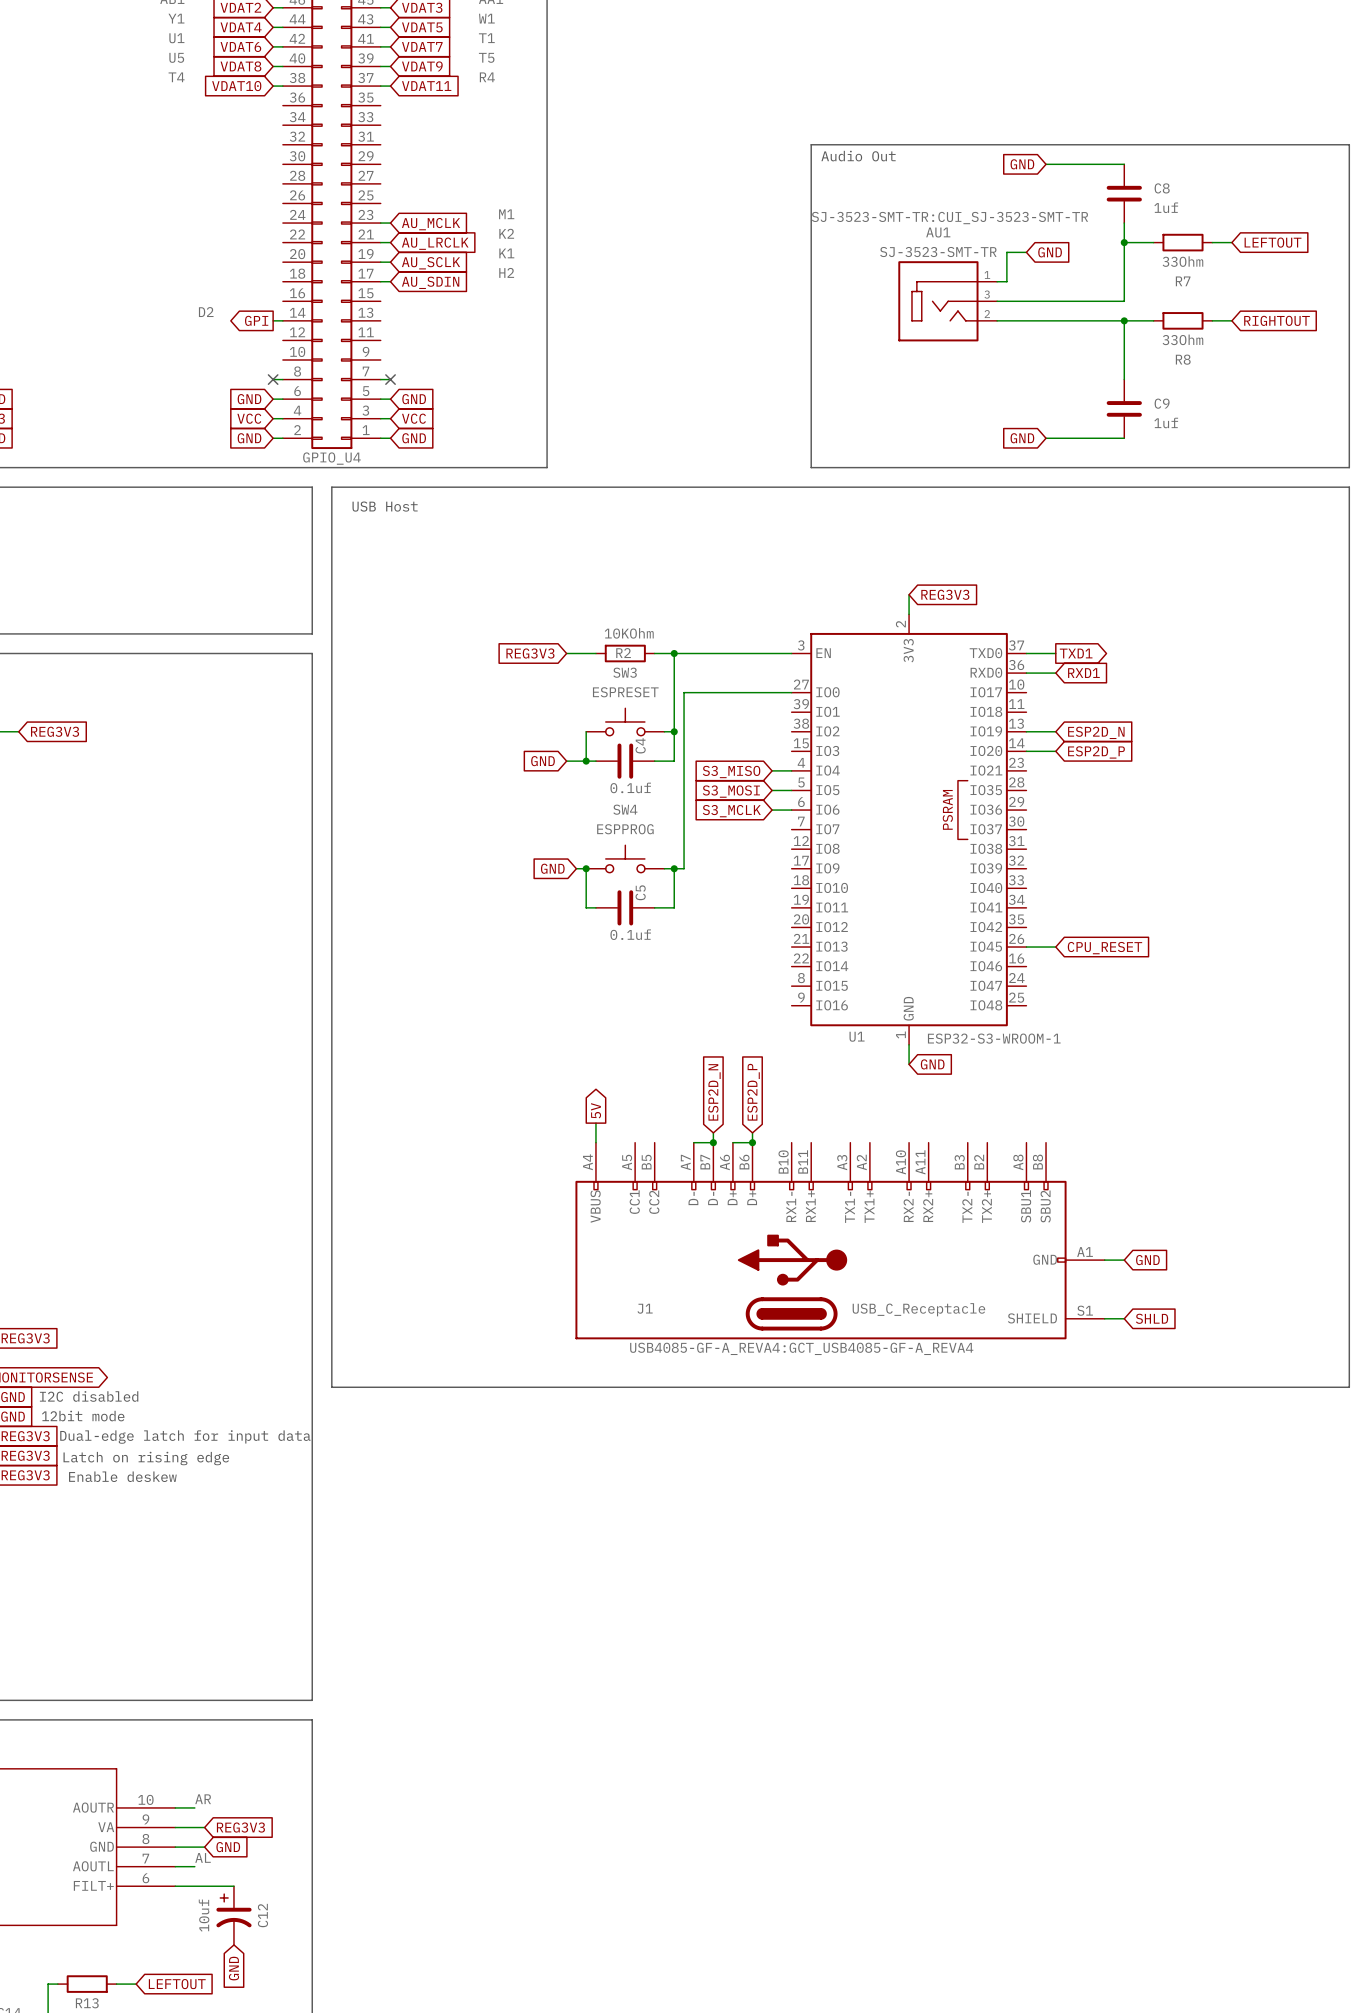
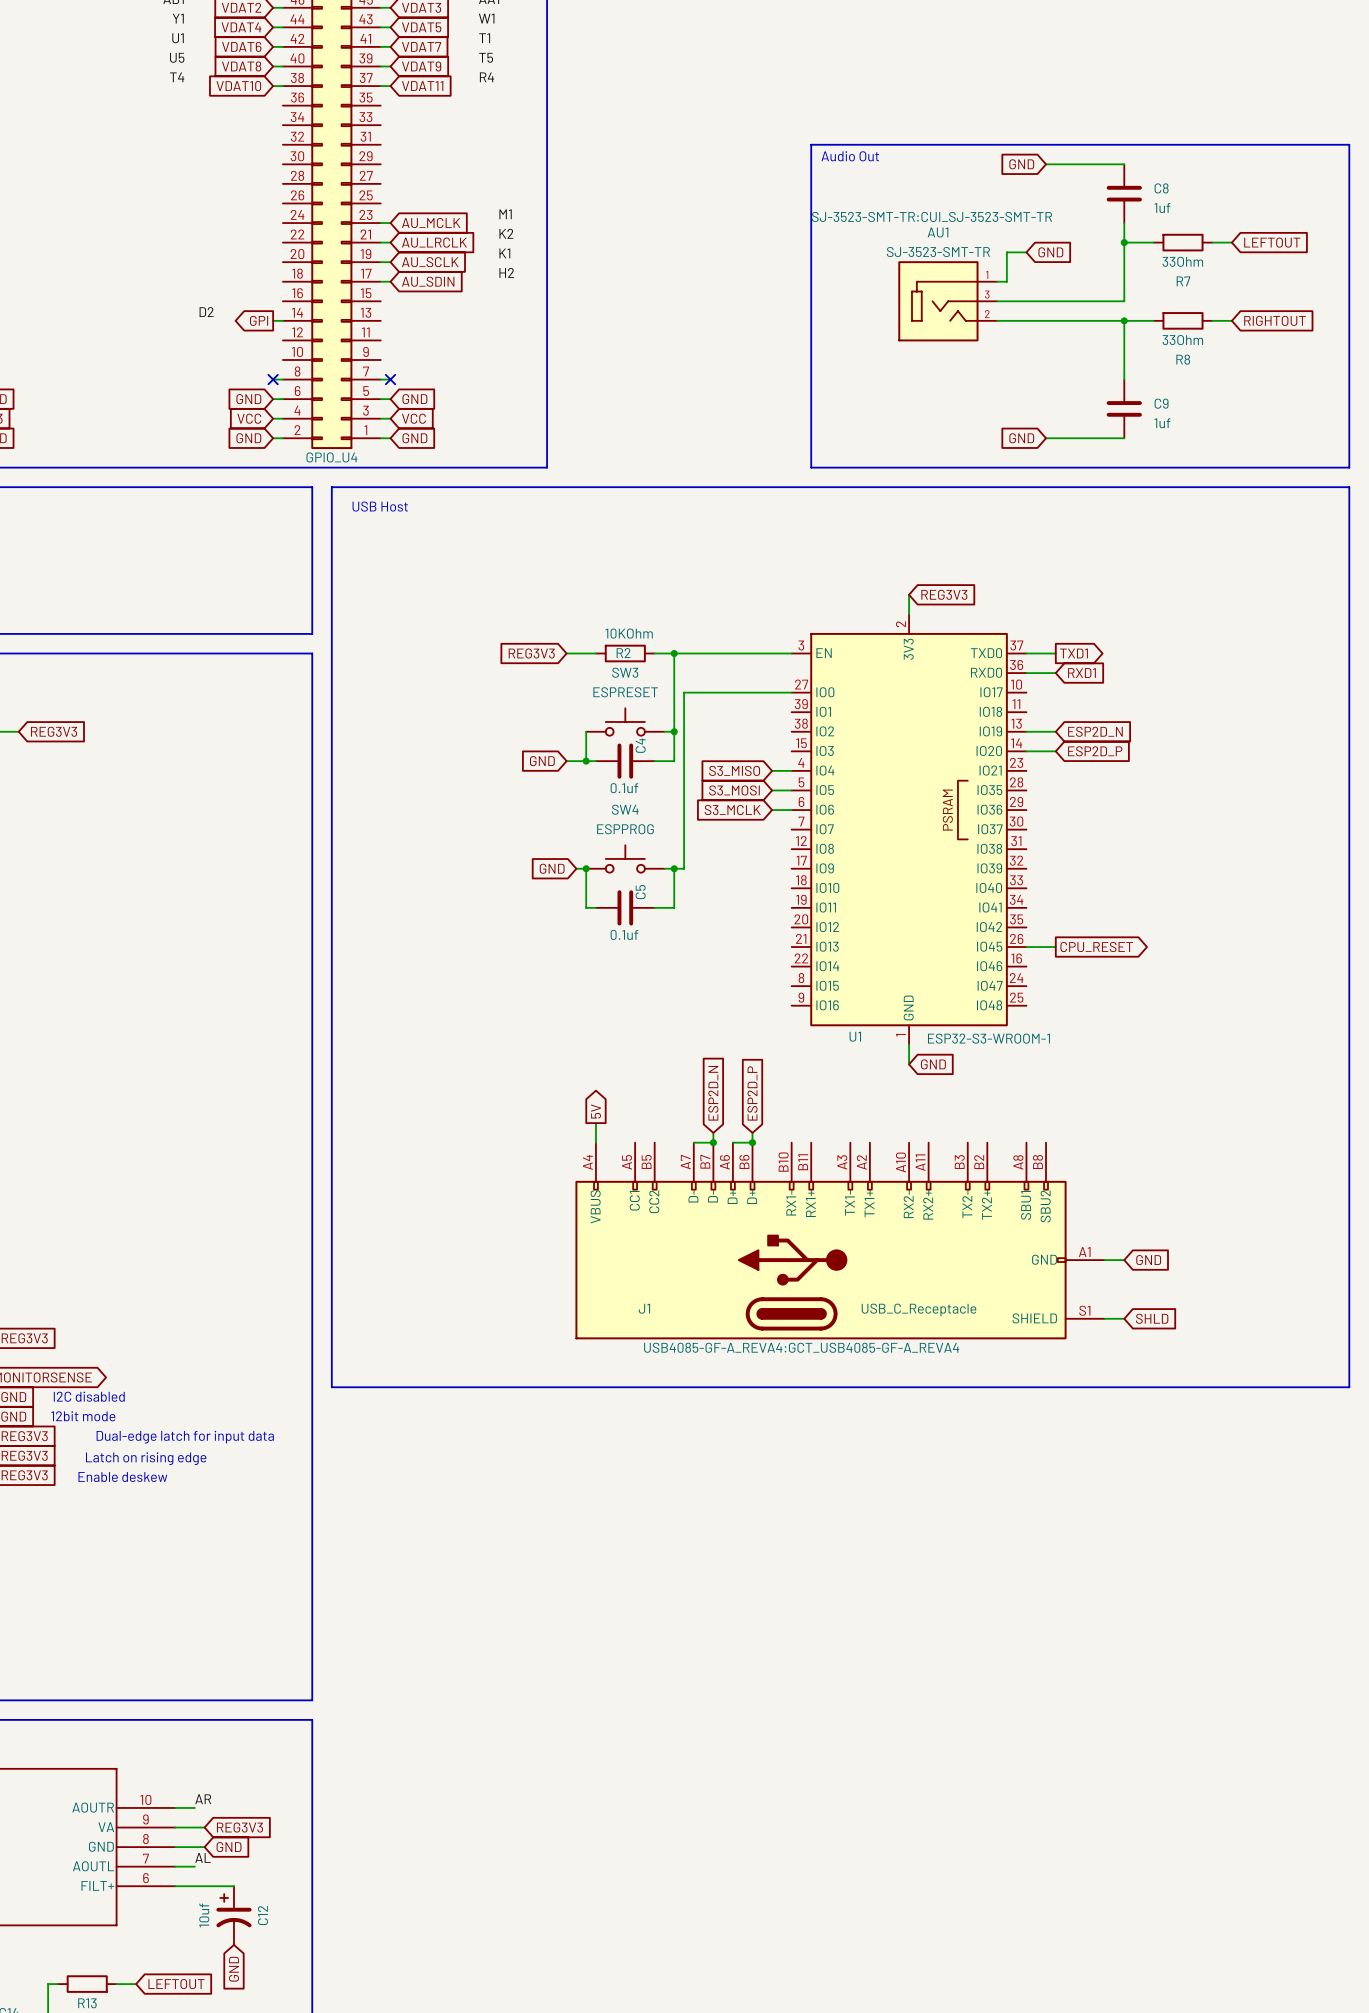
global label shape: input (1104, 948) -> output (1096, 947)

